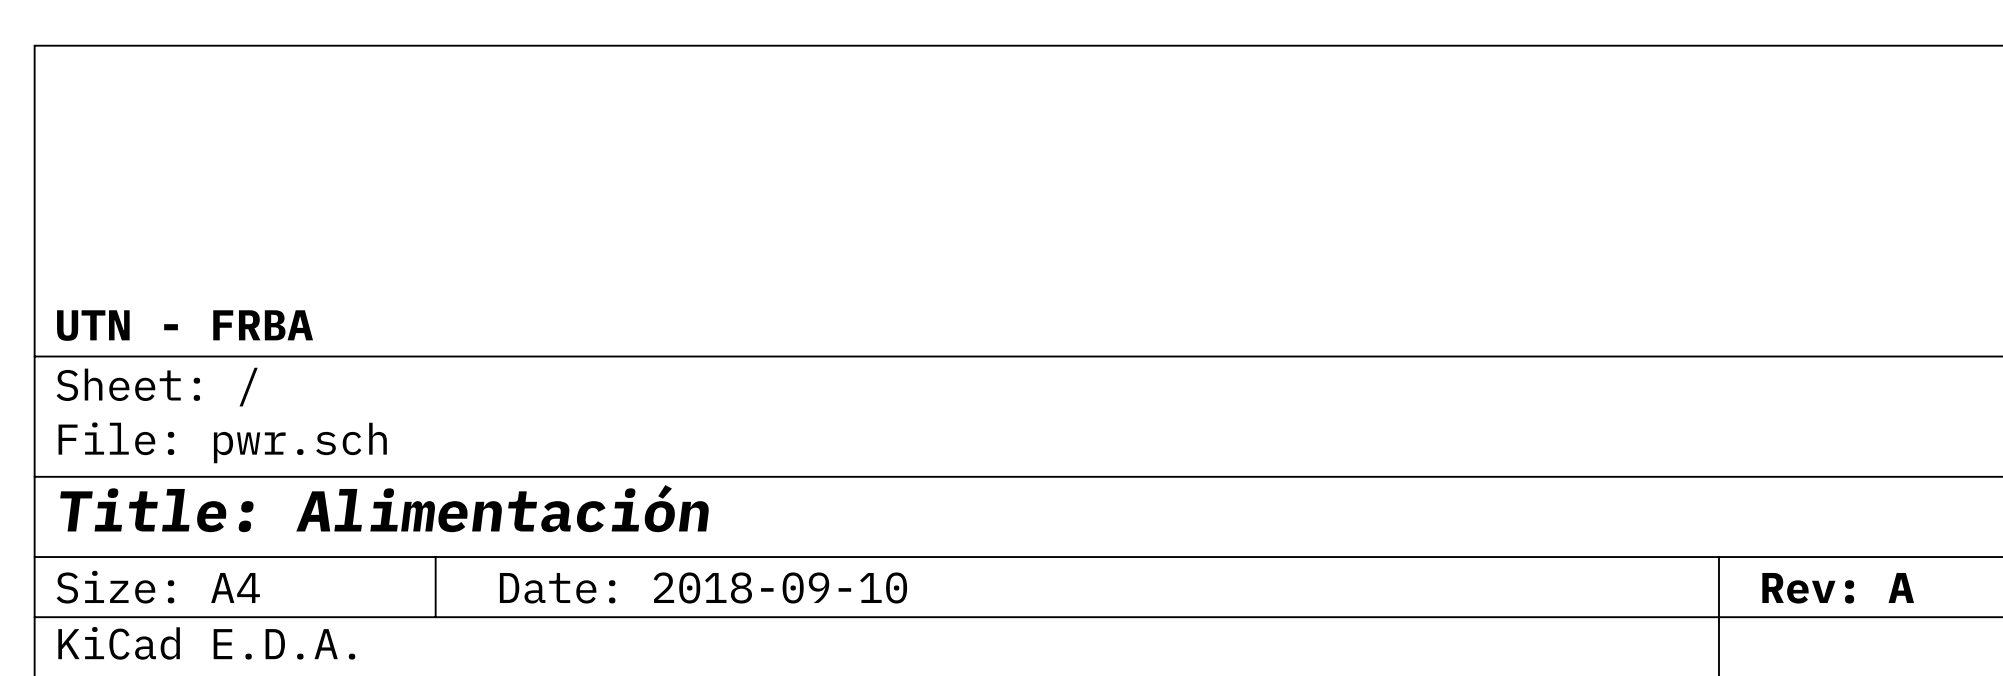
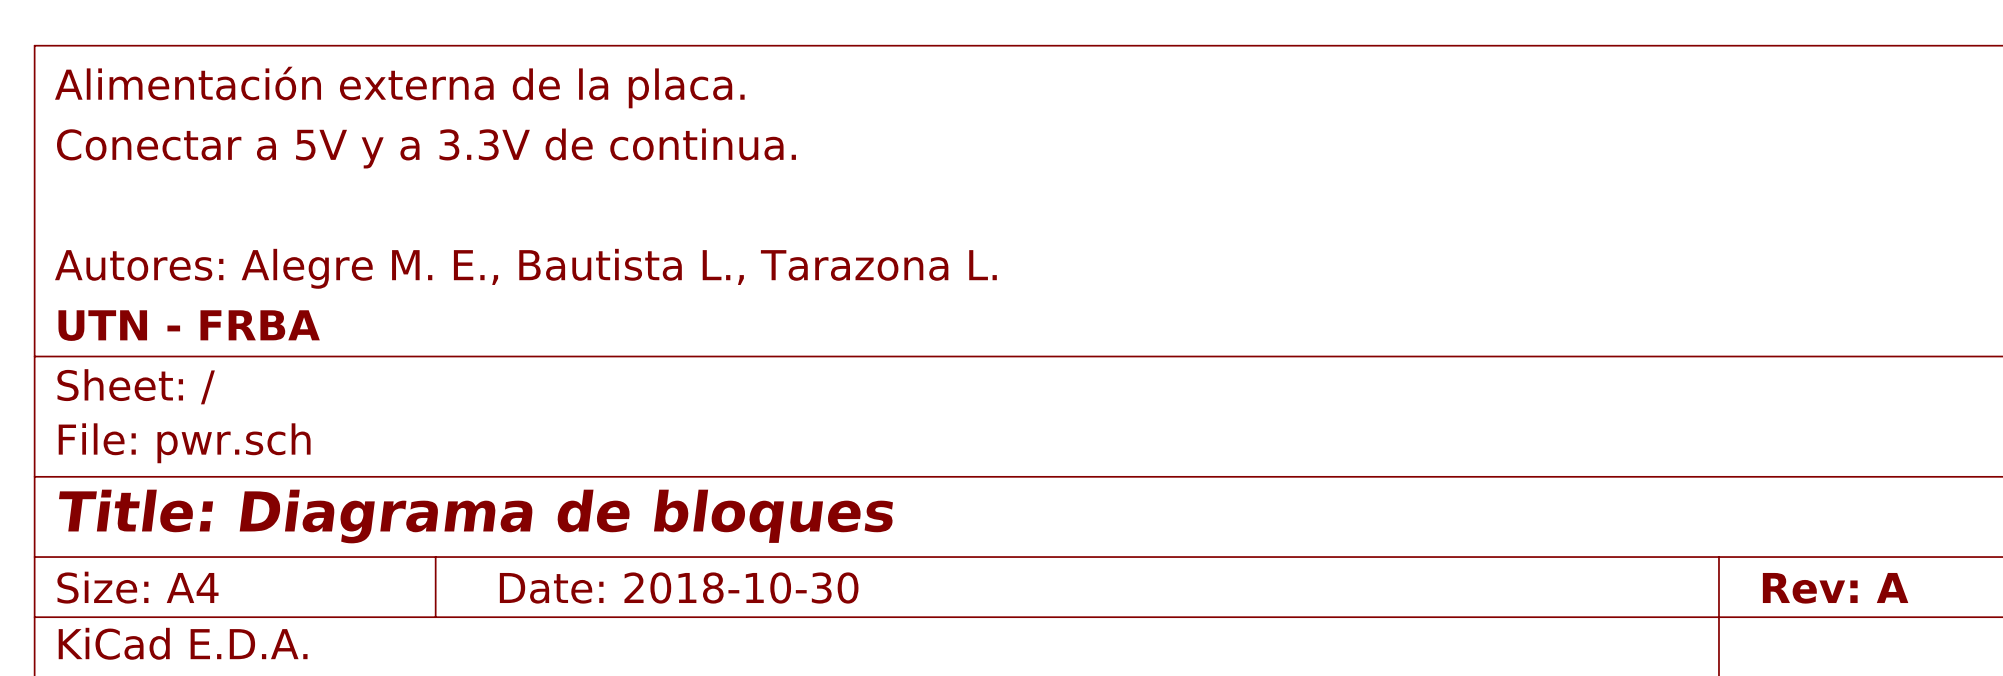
title block: none -> Alimentación externa de la placa. (399, 87)
title block: none -> Conectar a 5V y a 3.3V de continua. (426, 148)
title block: none -> Autores: Alegre M. E., Bautista L., Tarazona L. (525, 268)
title block: Title: Alimentación (384, 508) -> Title: Diagrama de bloques (476, 516)
title block: Date: 2018-09-10 (703, 587) -> Date: 2018-10-30 (679, 588)

